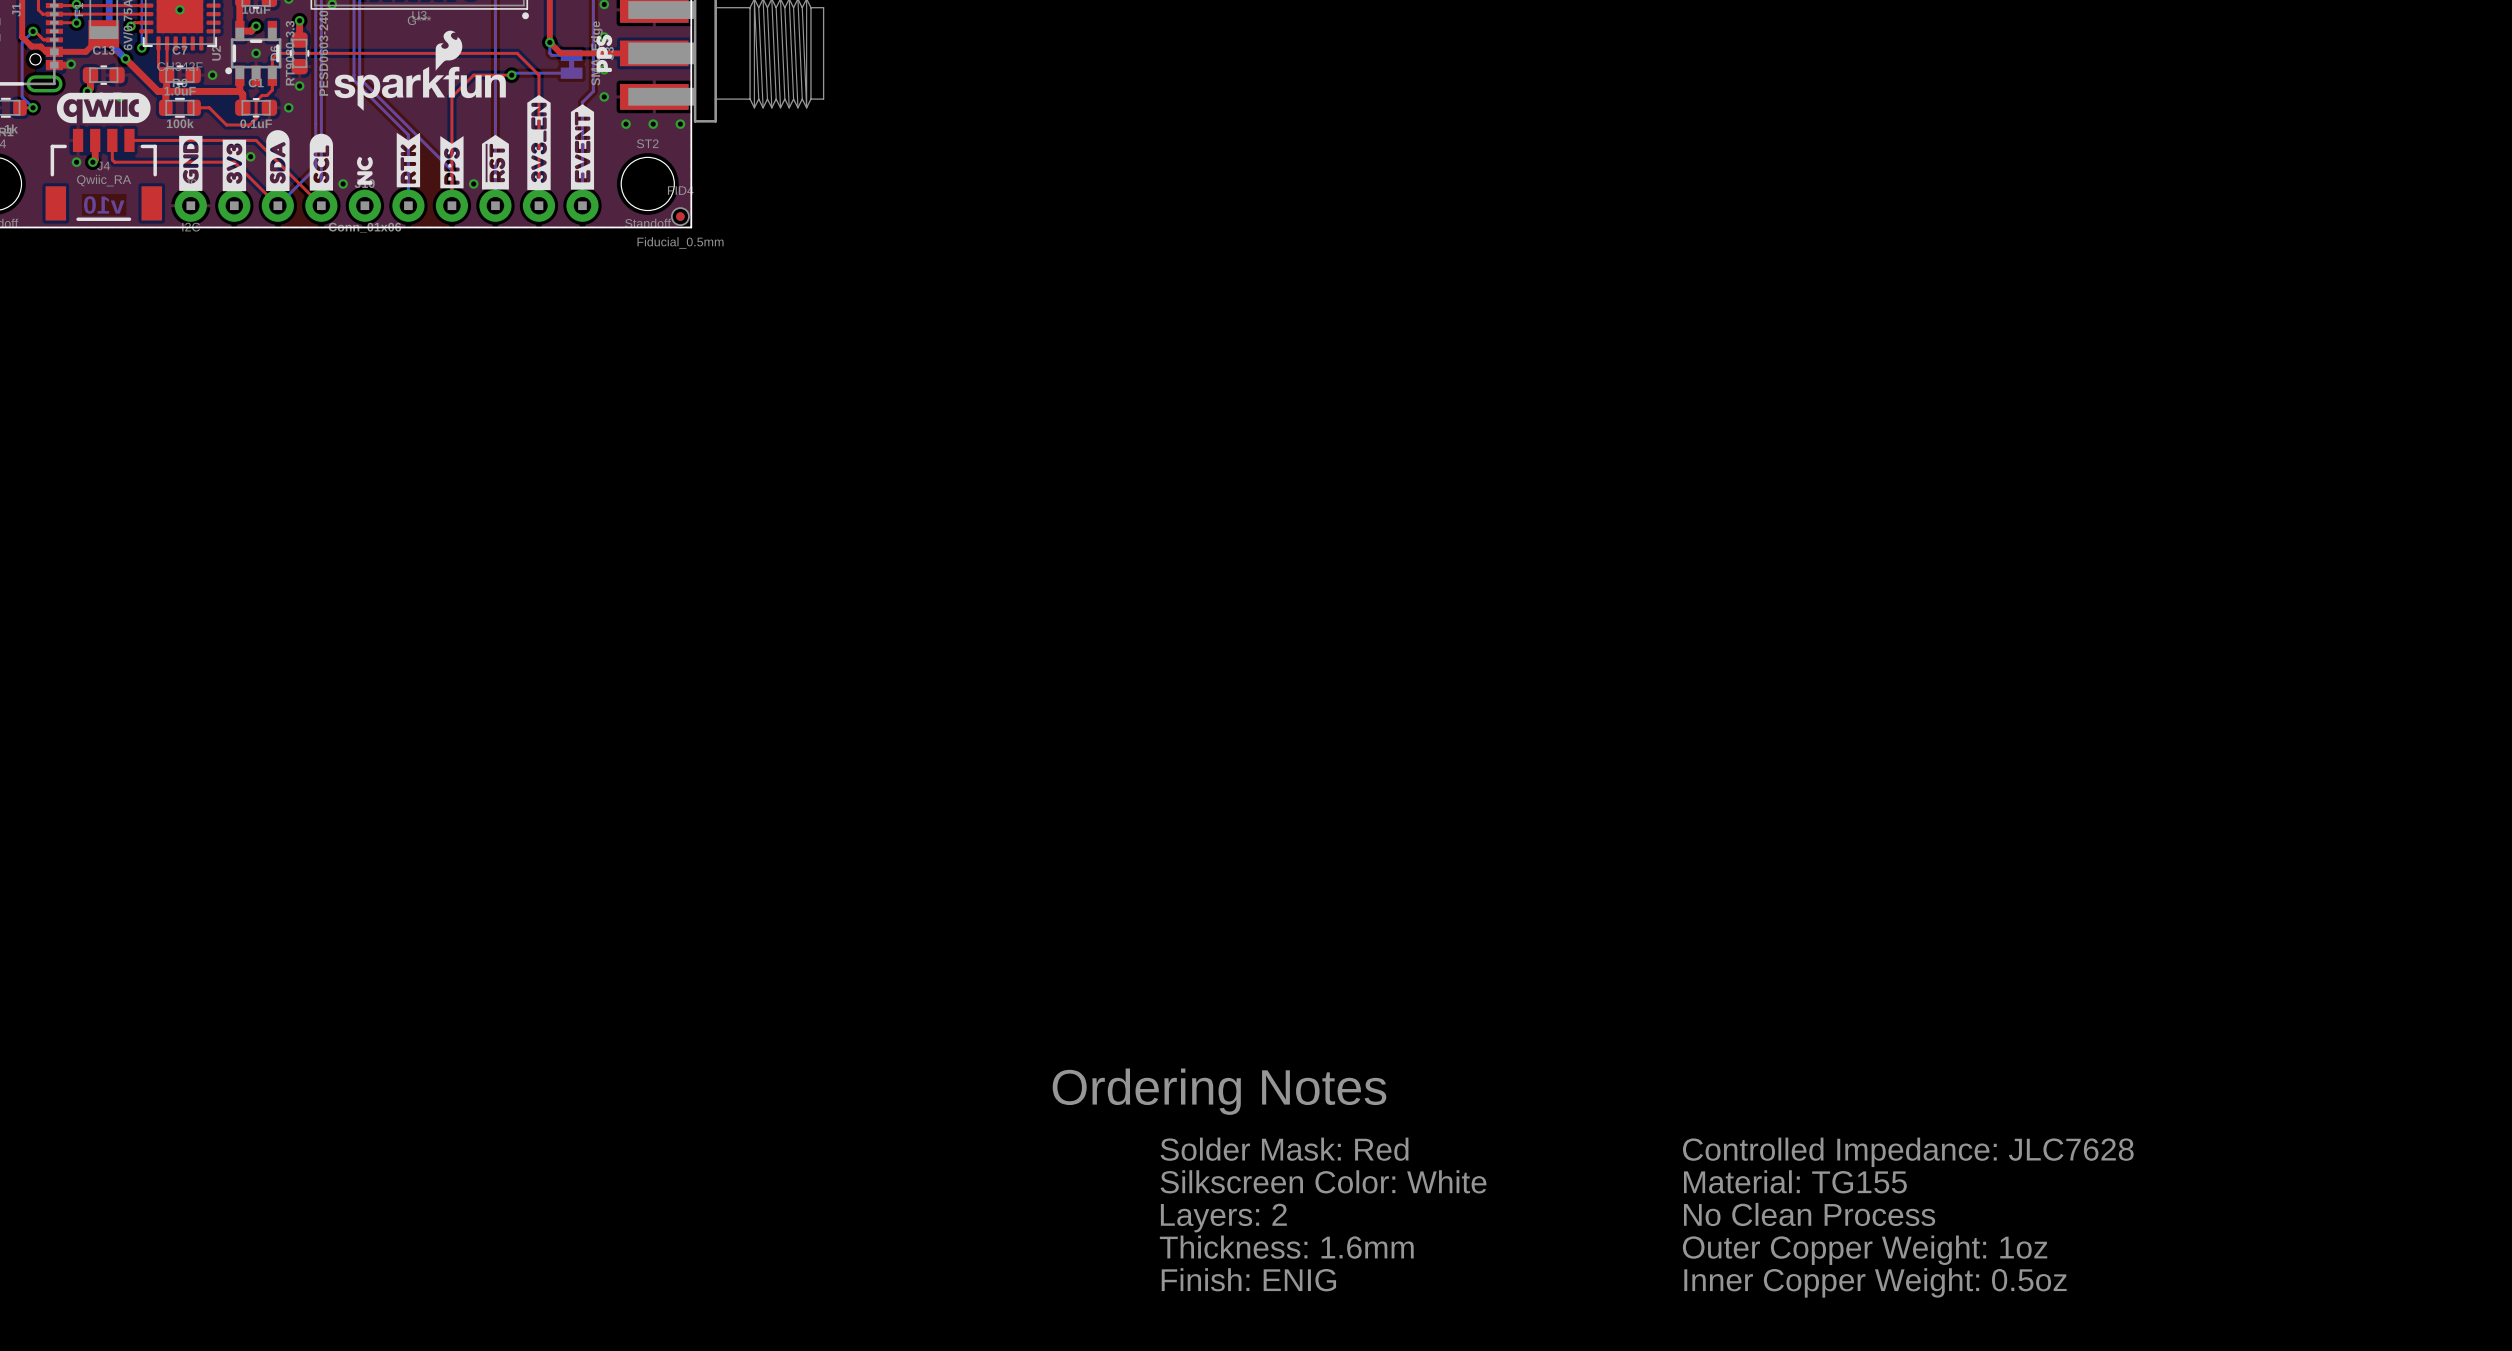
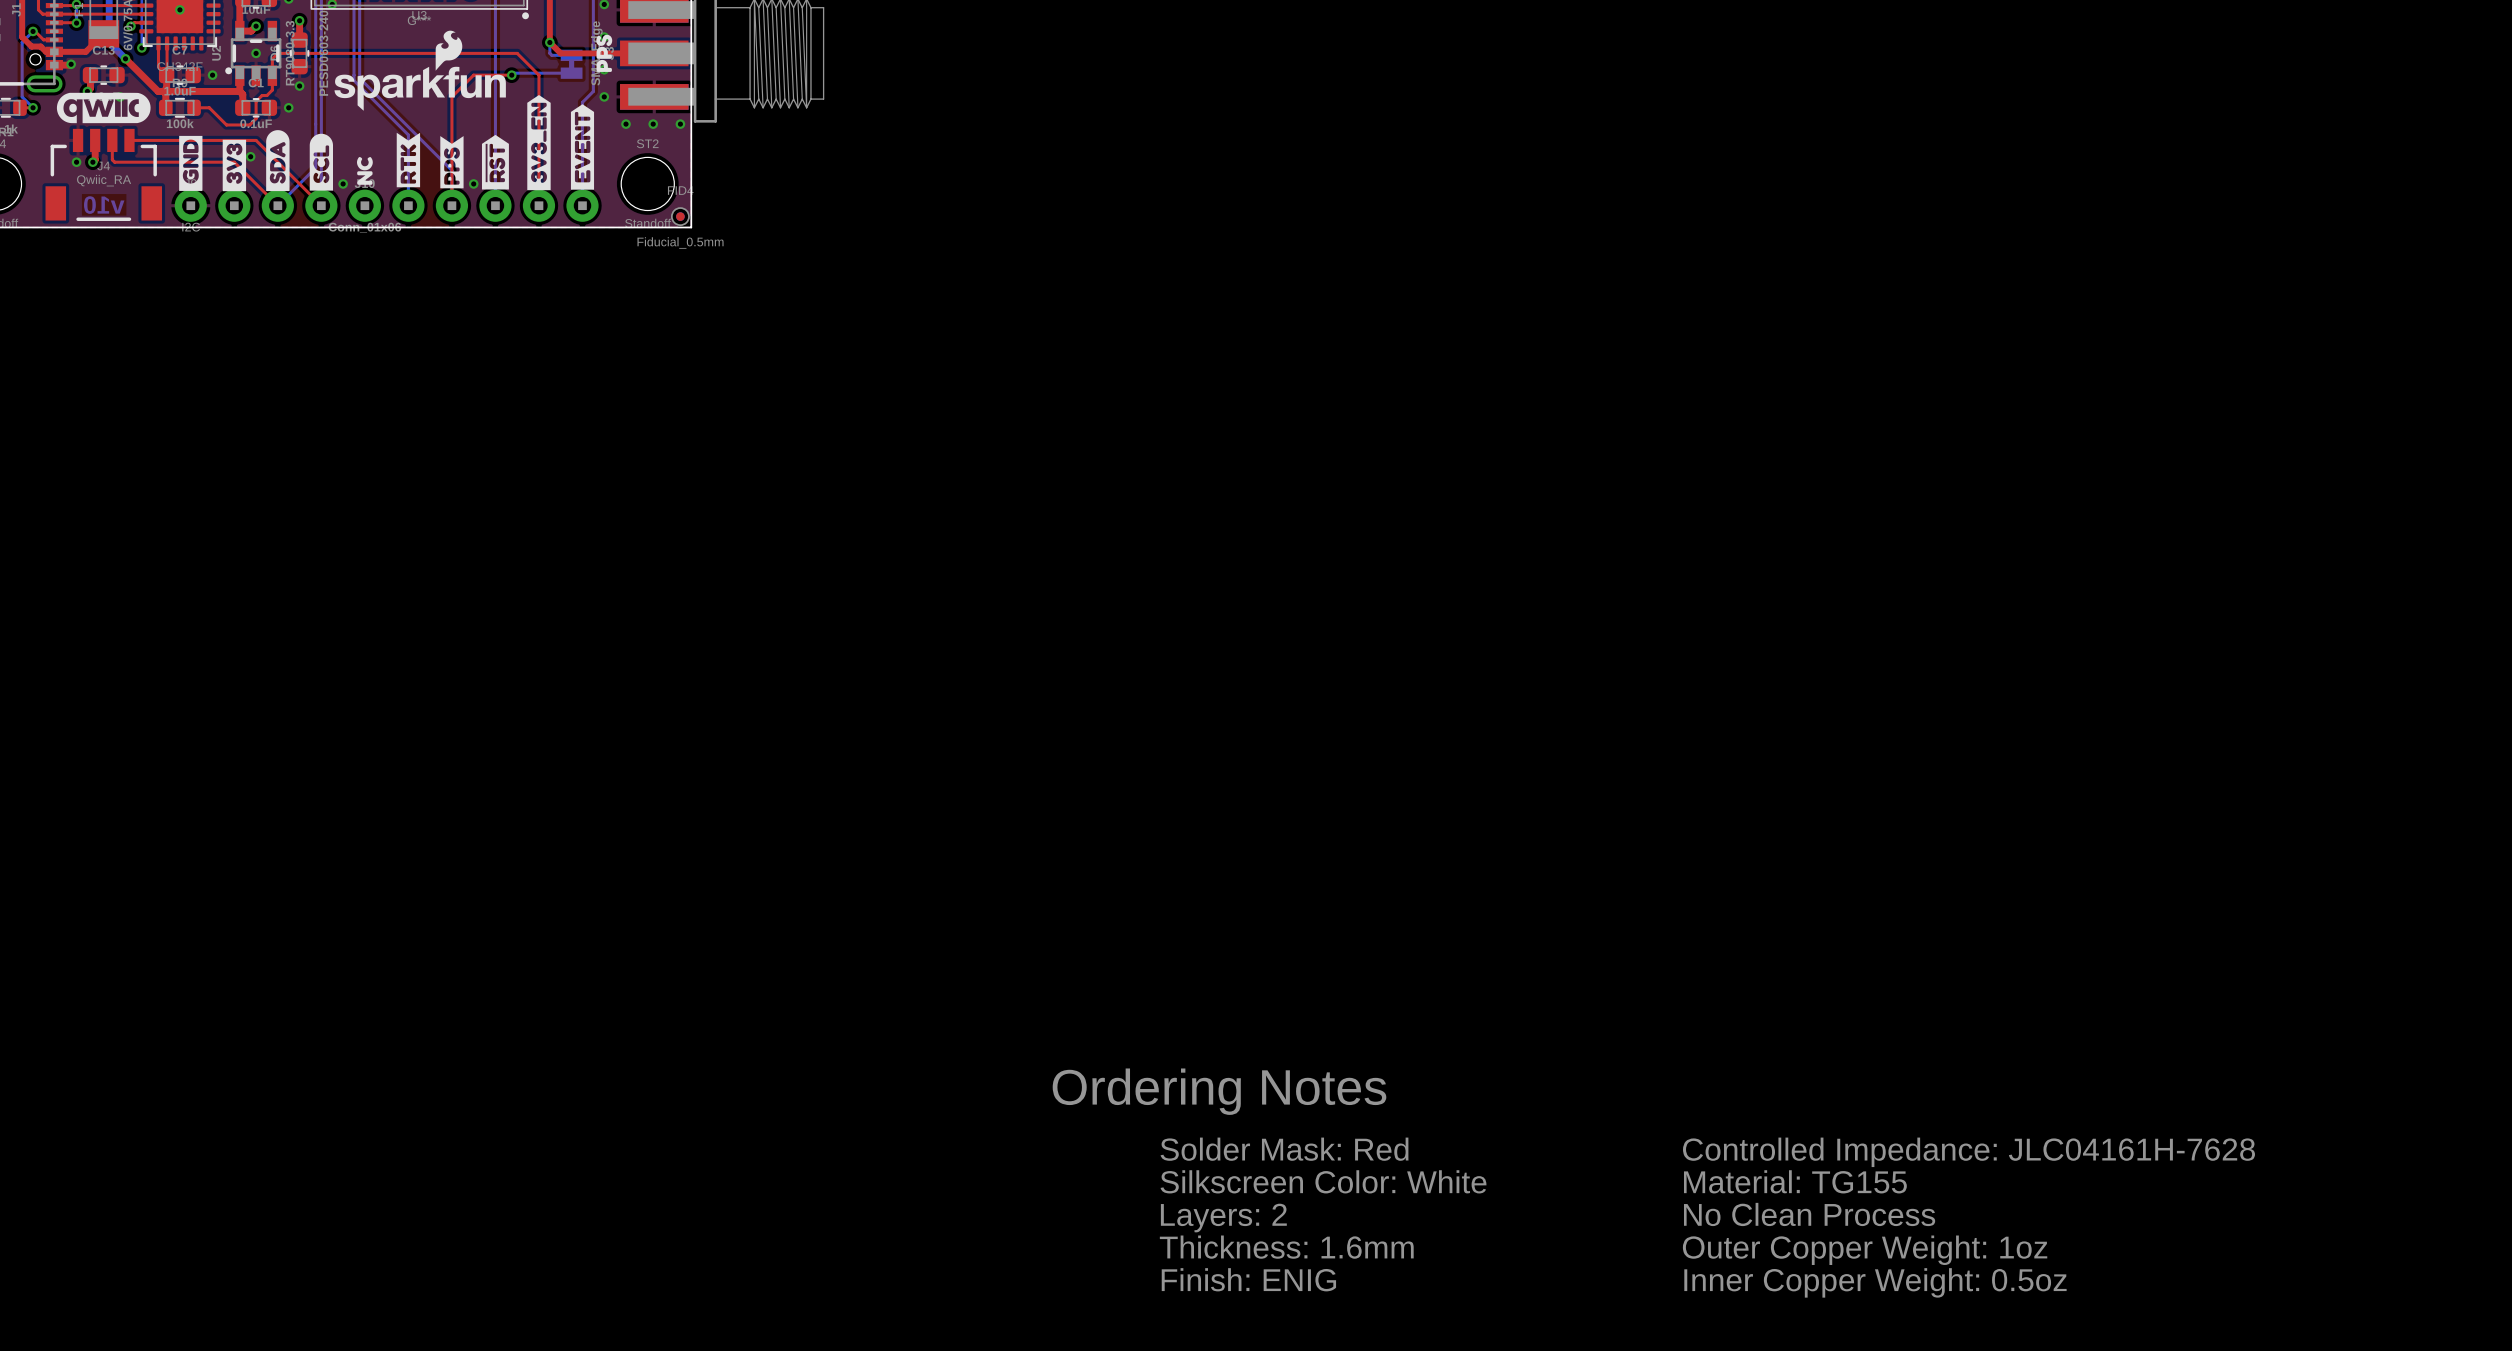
text: Controlled Impedance: JLC7628 (1908, 1152) -> Controlled Impedance: JLC04161H-7628 (1968, 1152)

